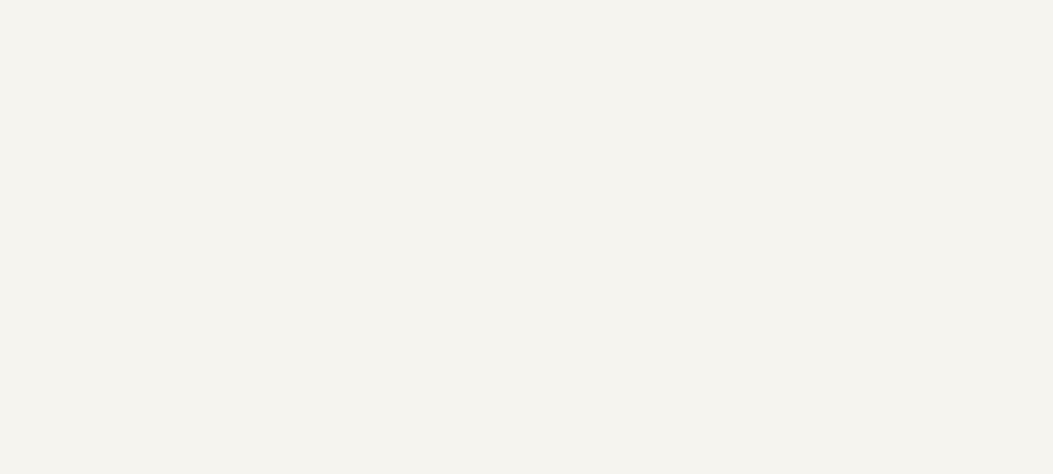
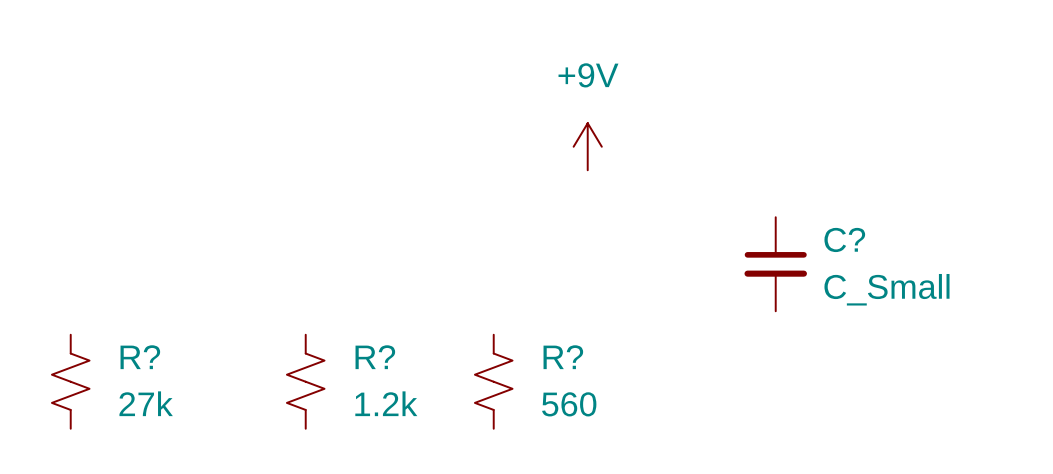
power symbol: none -> +9V (587, 146)
C?: none -> C_Small (775, 264)
R?: none -> 27k (70, 381)
R?: none -> 1.2k (305, 381)
R?: none -> 560 (493, 381)

